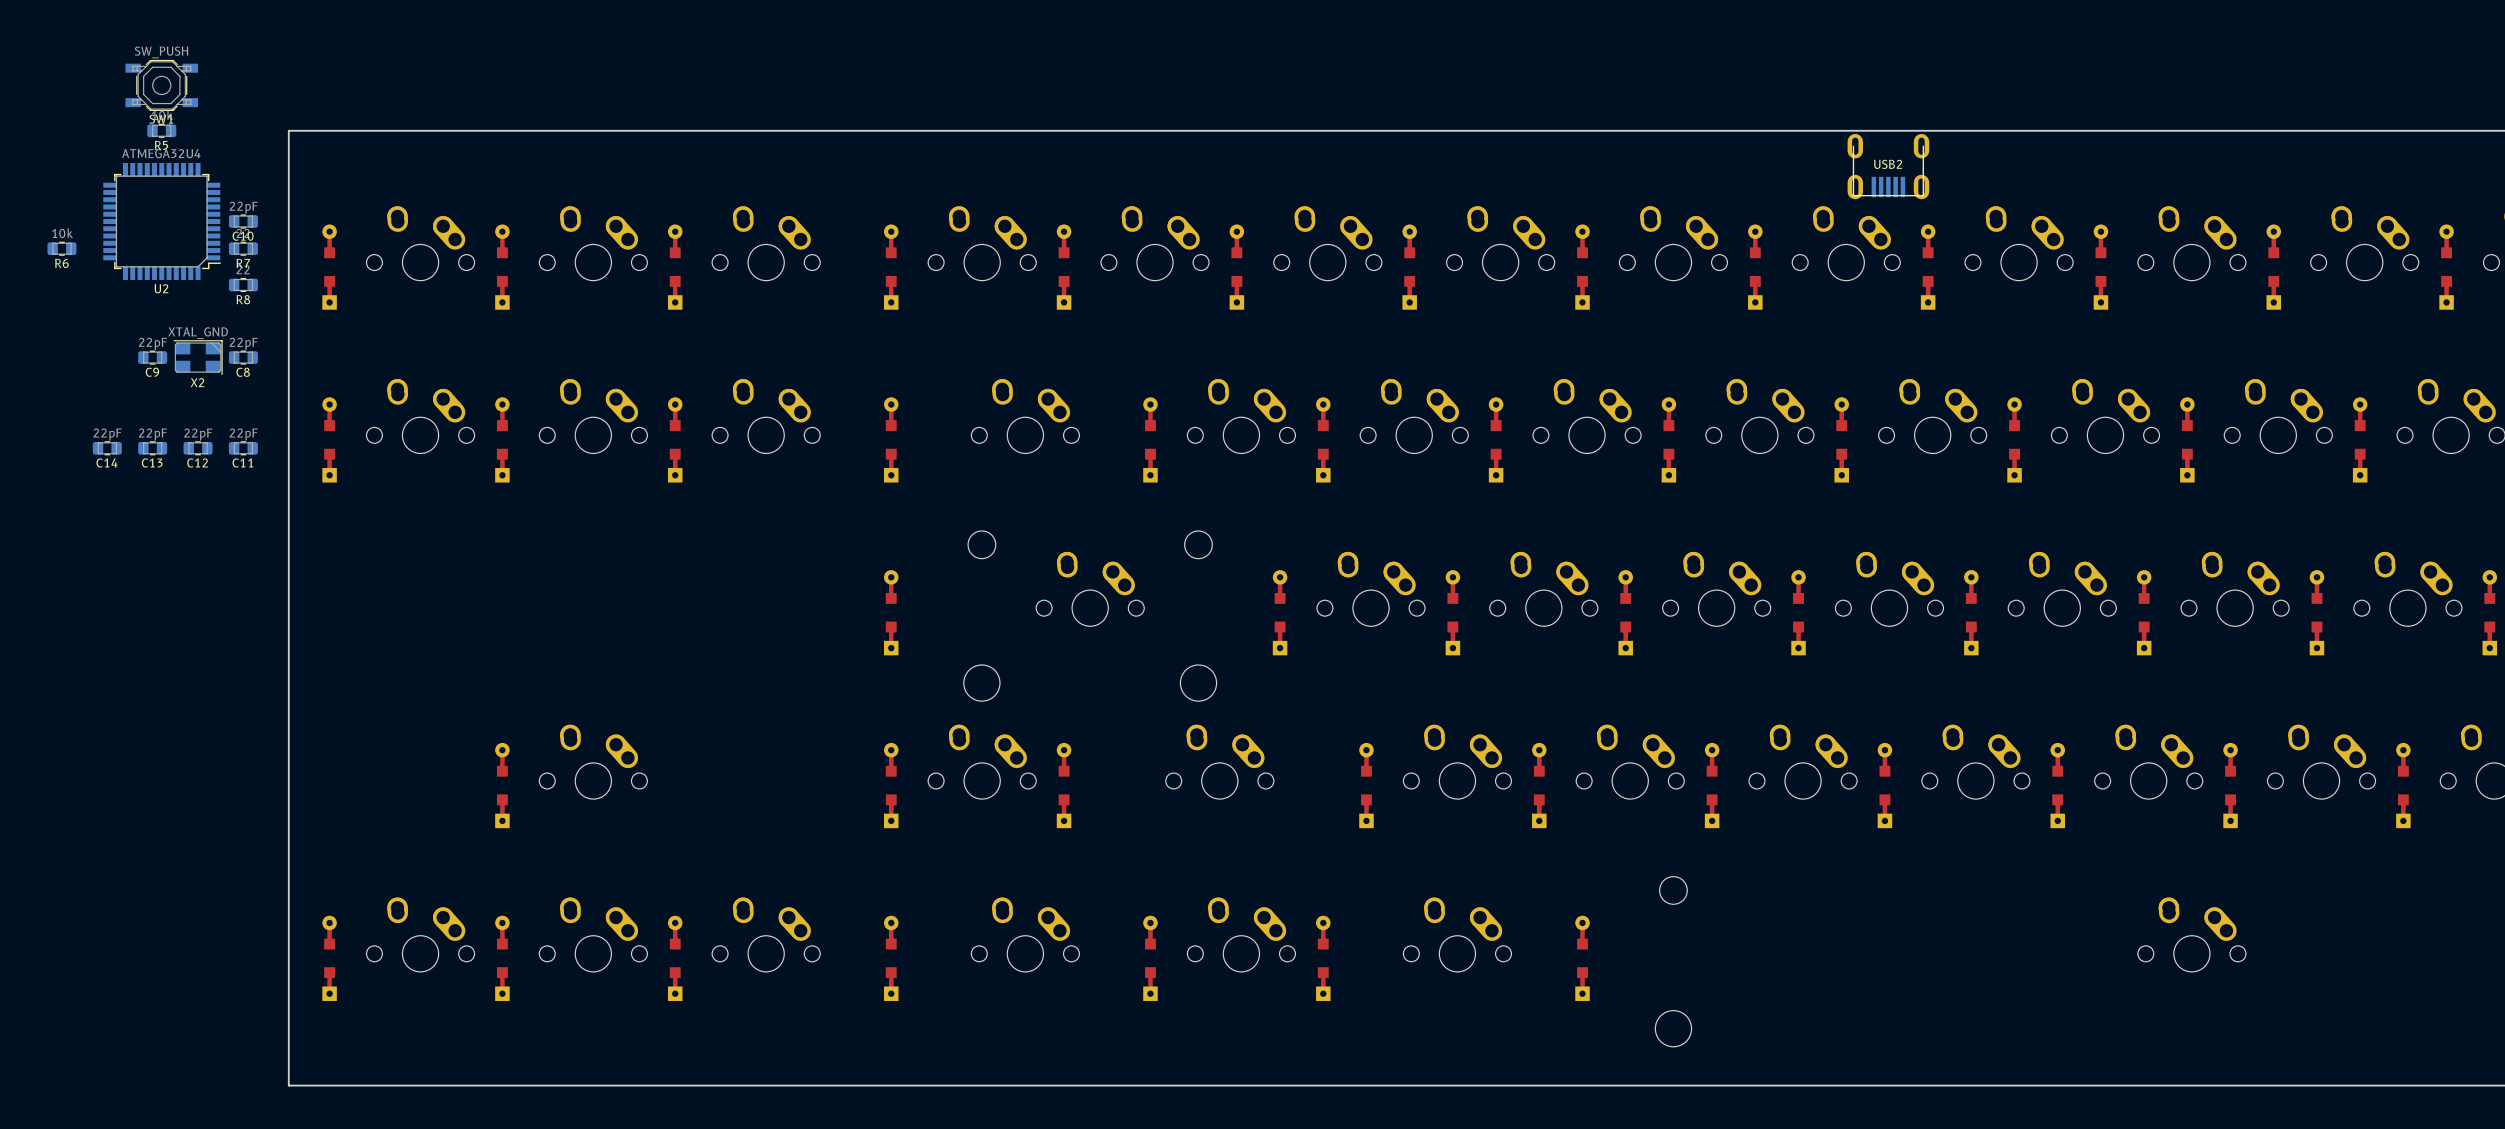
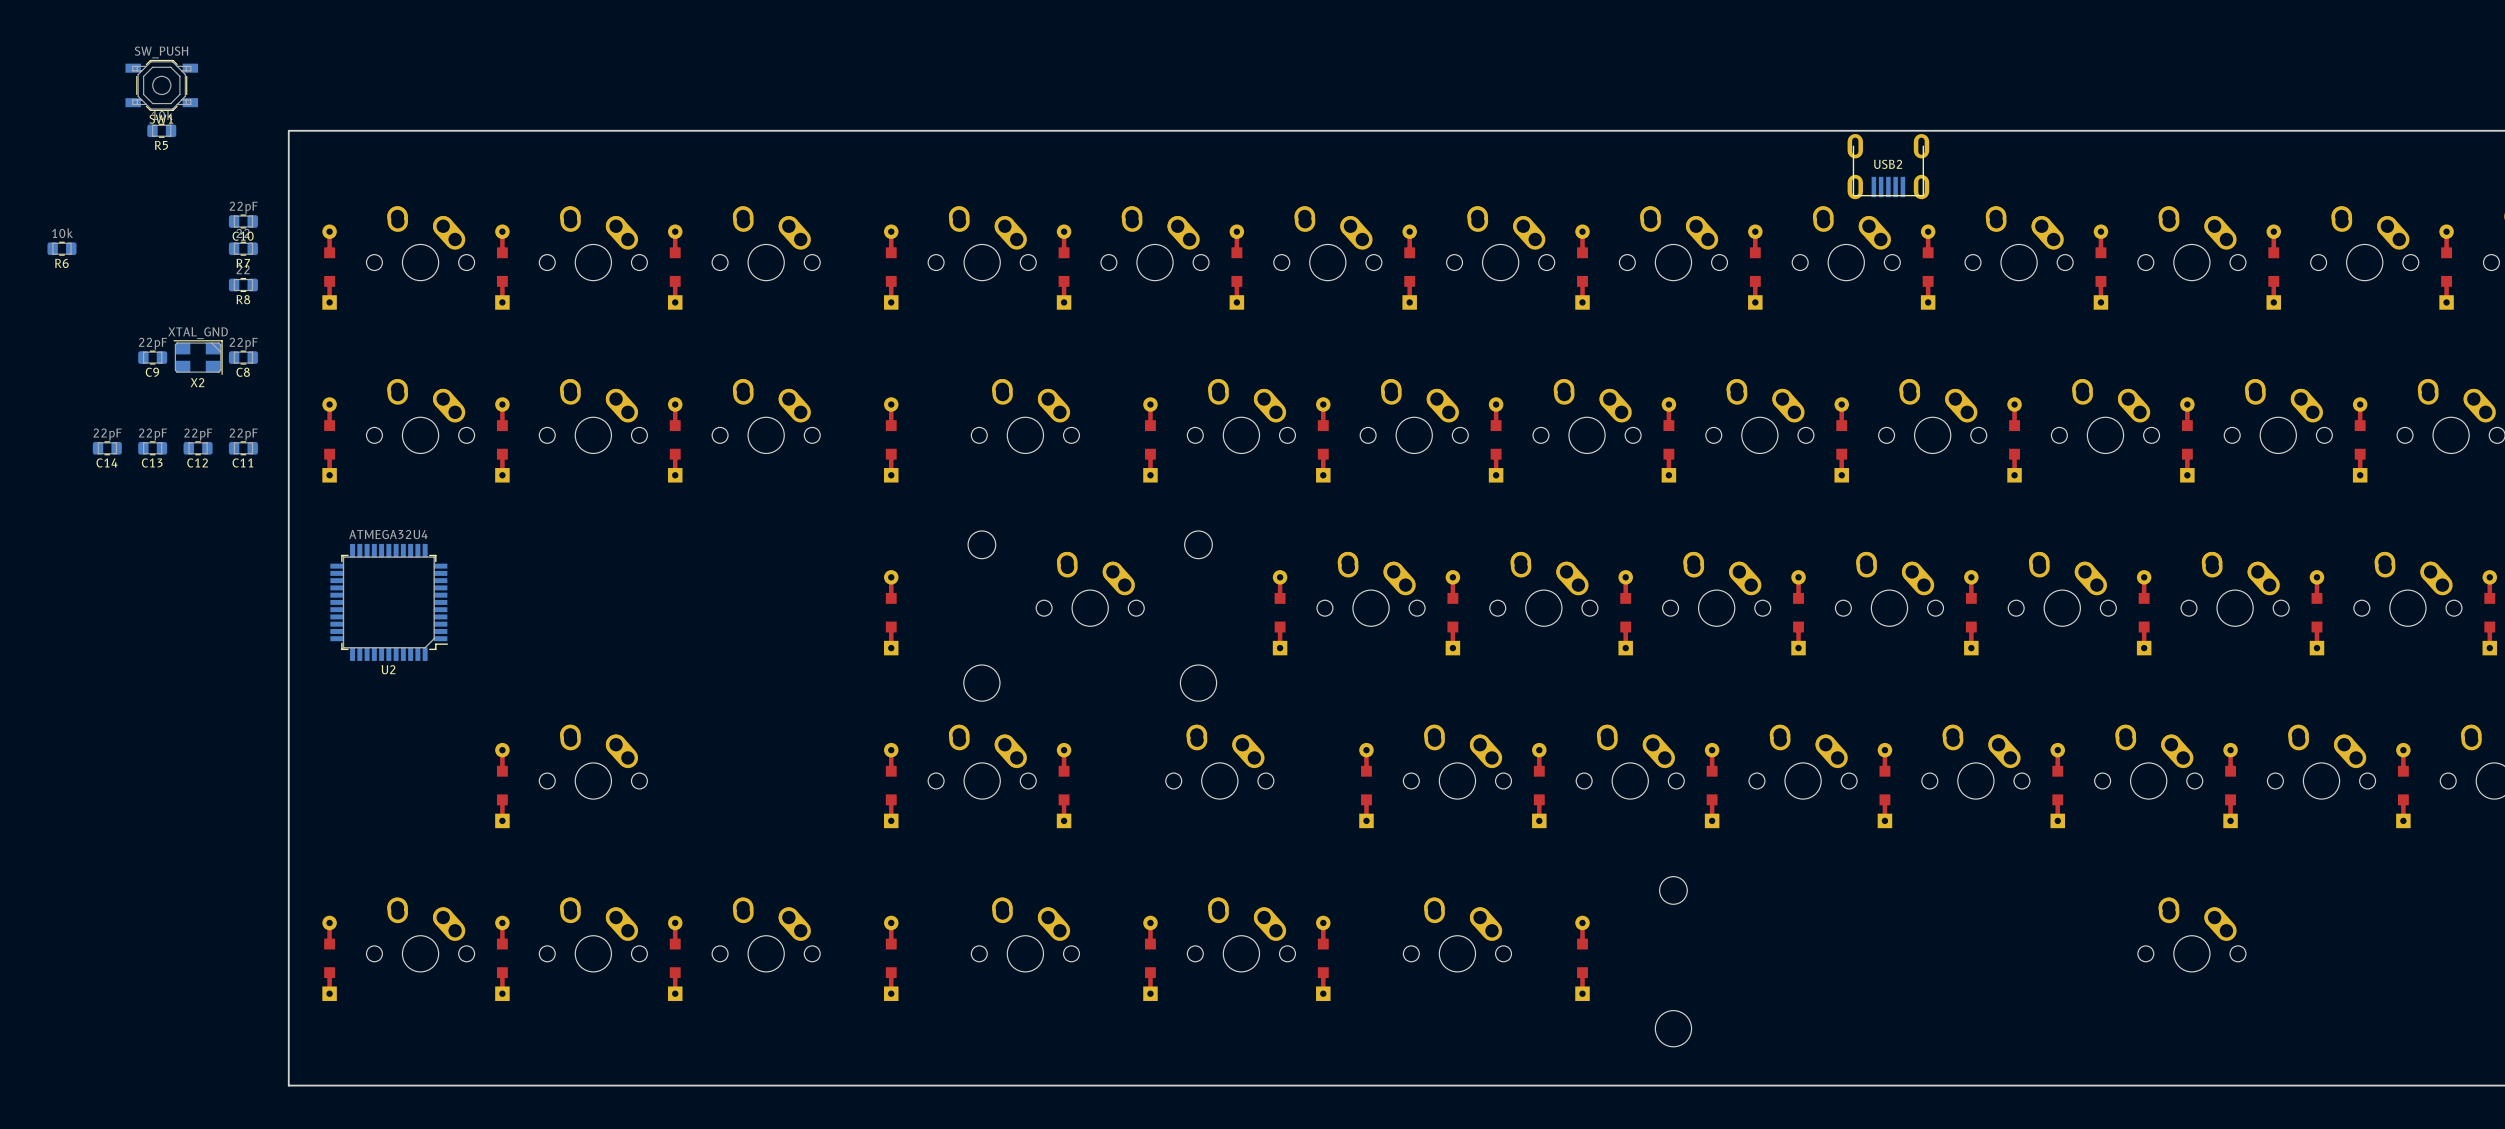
U2 position: (162, 221) -> (389, 602)

